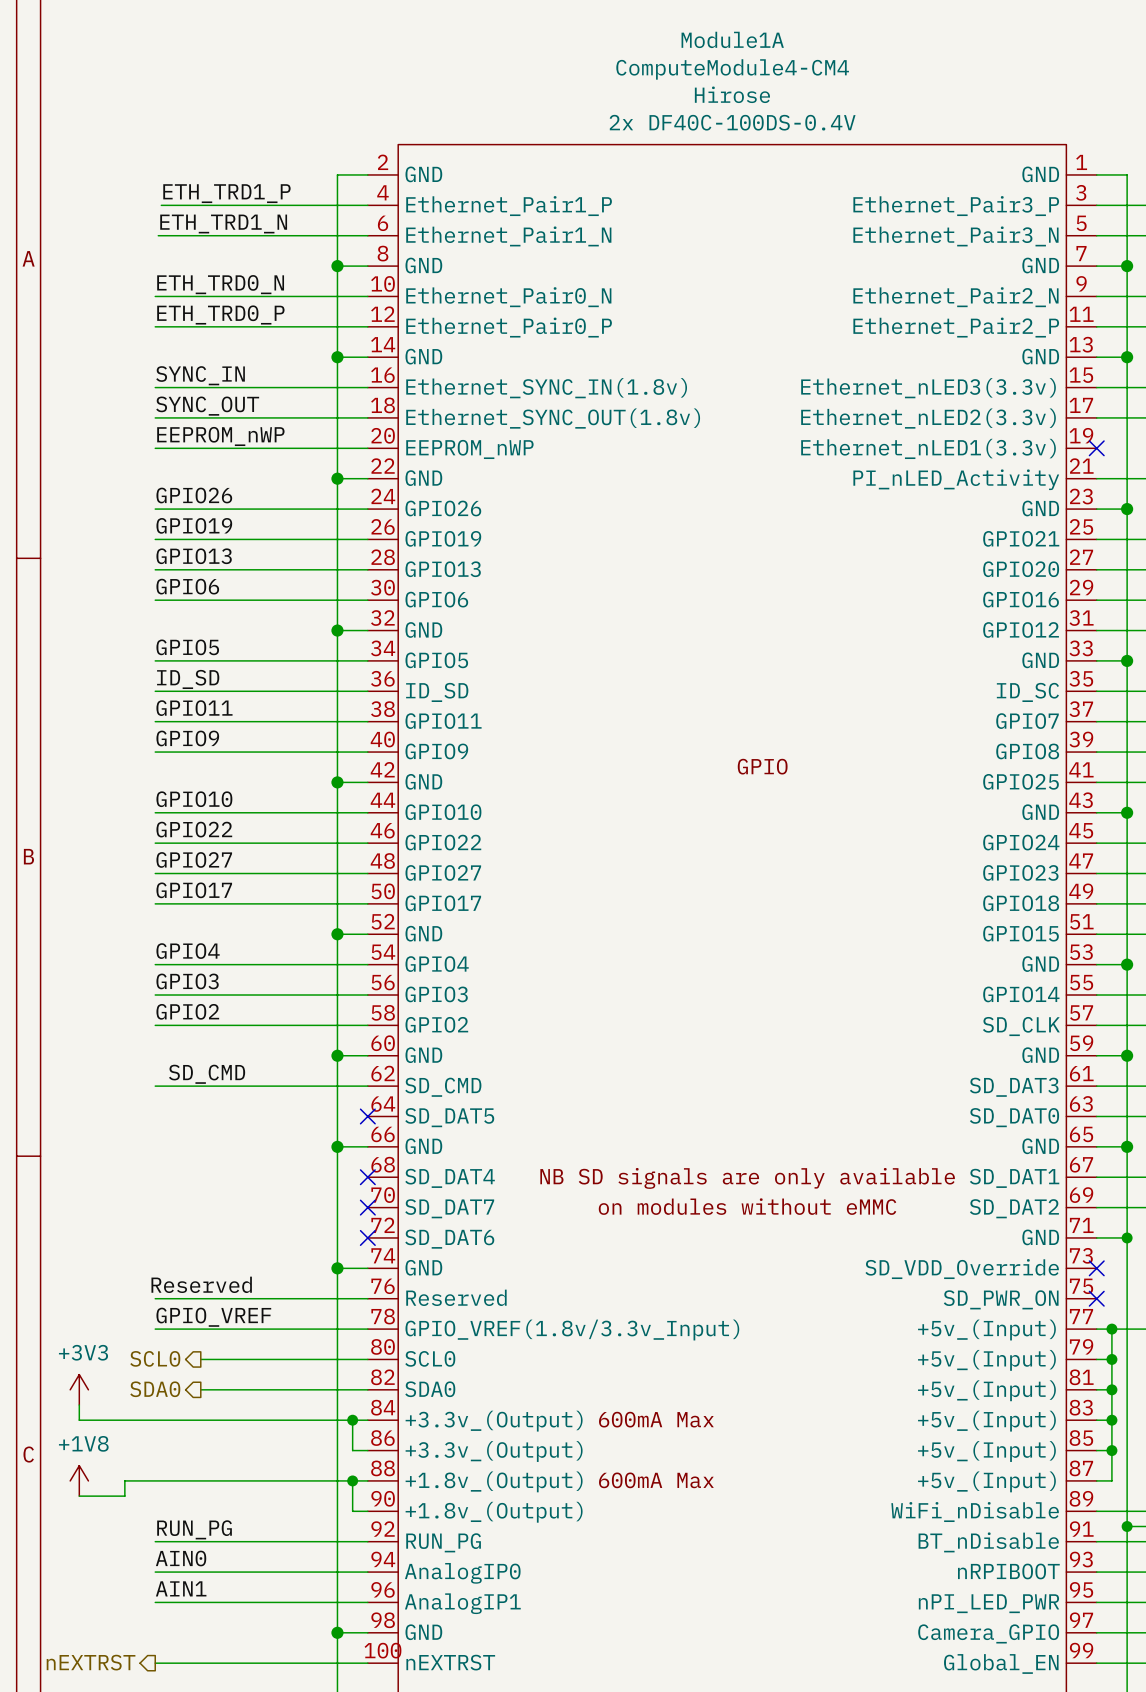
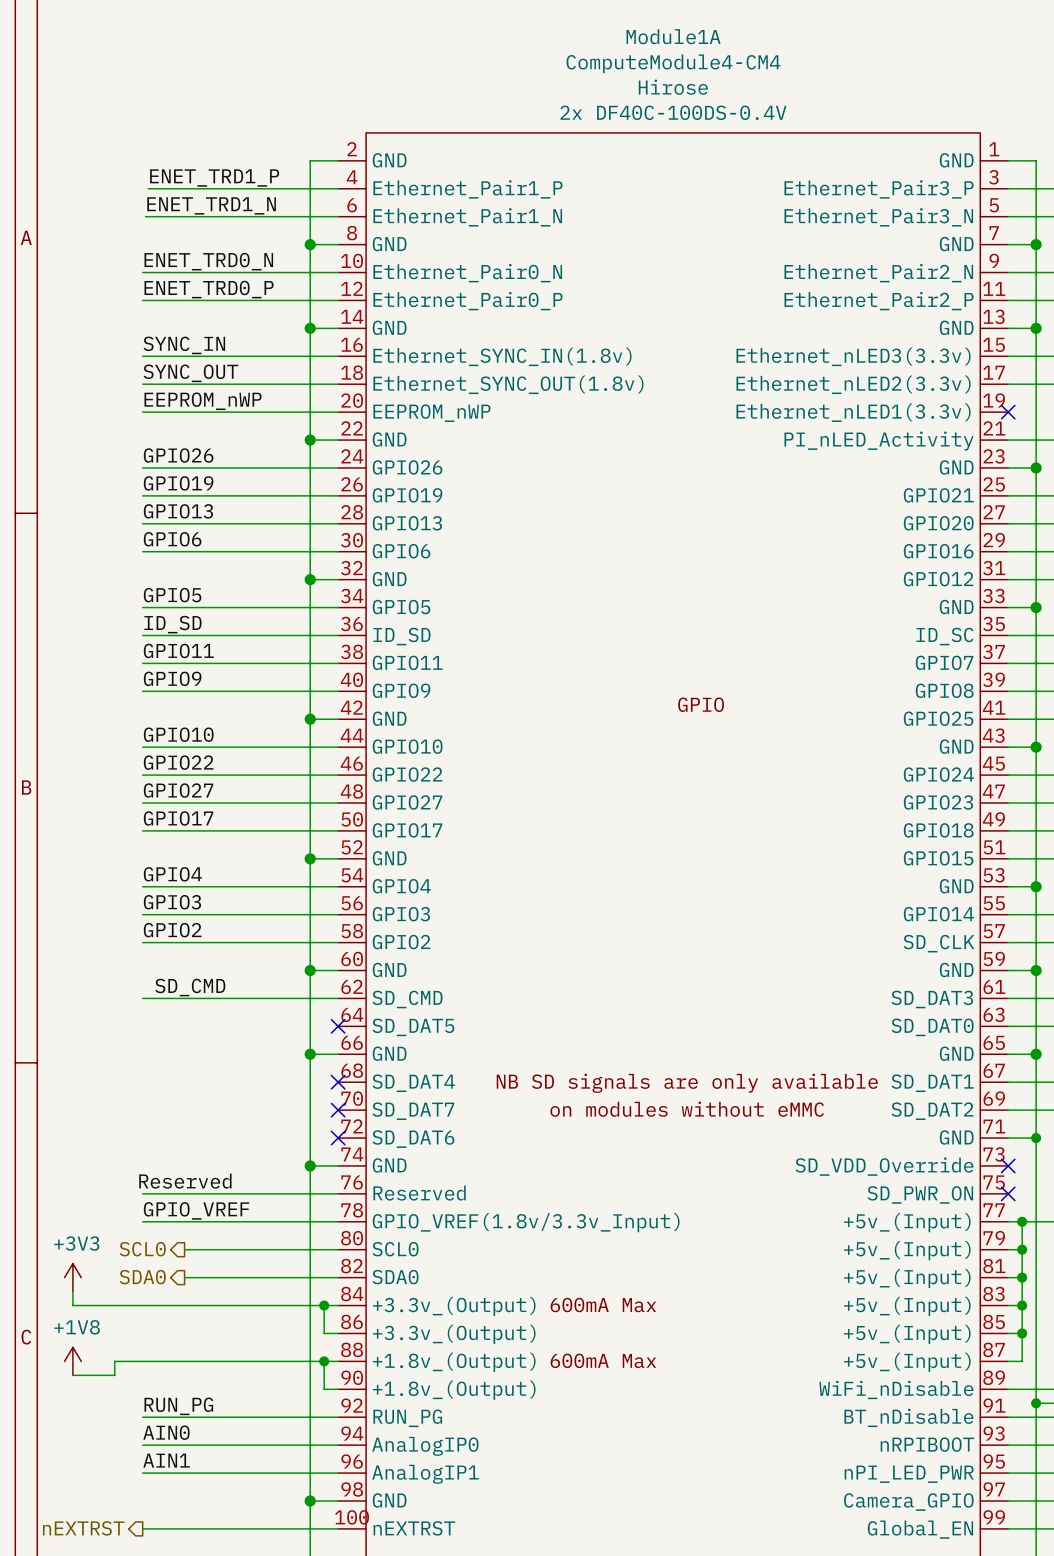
label: ETH_TRD1_P (226, 193) -> ENET_TRD1_P (214, 178)
label: ETH_TRD1_N (223, 224) -> ENET_TRD1_N (211, 205)
label: ETH_TRD0_N (220, 284) -> ENET_TRD0_N (208, 261)
label: ETH_TRD0_P (220, 314) -> ENET_TRD0_P (209, 289)

